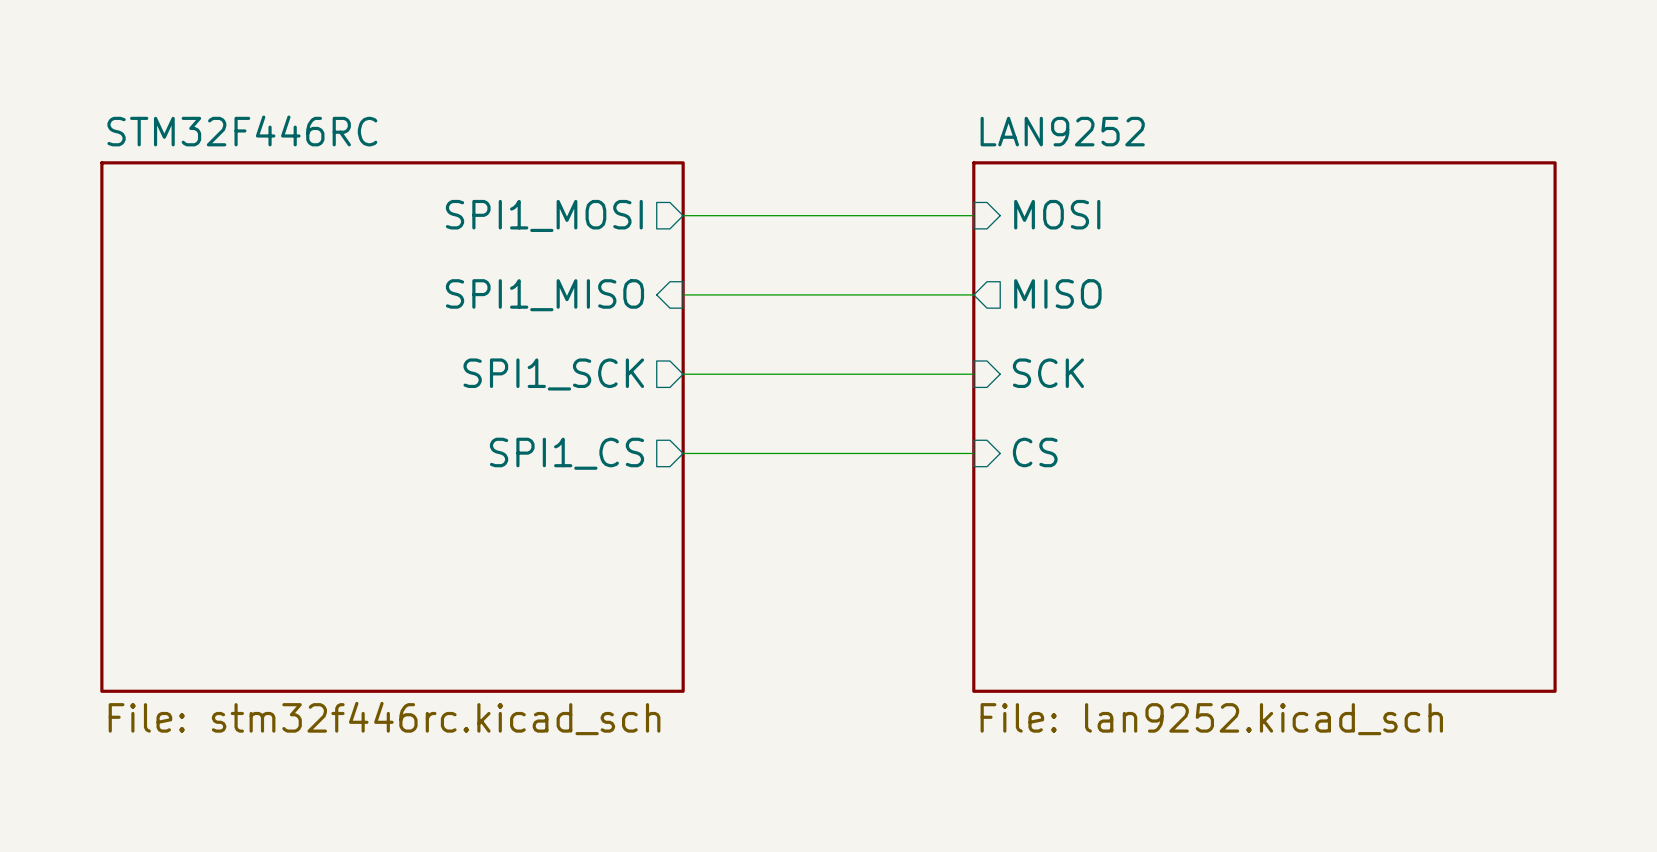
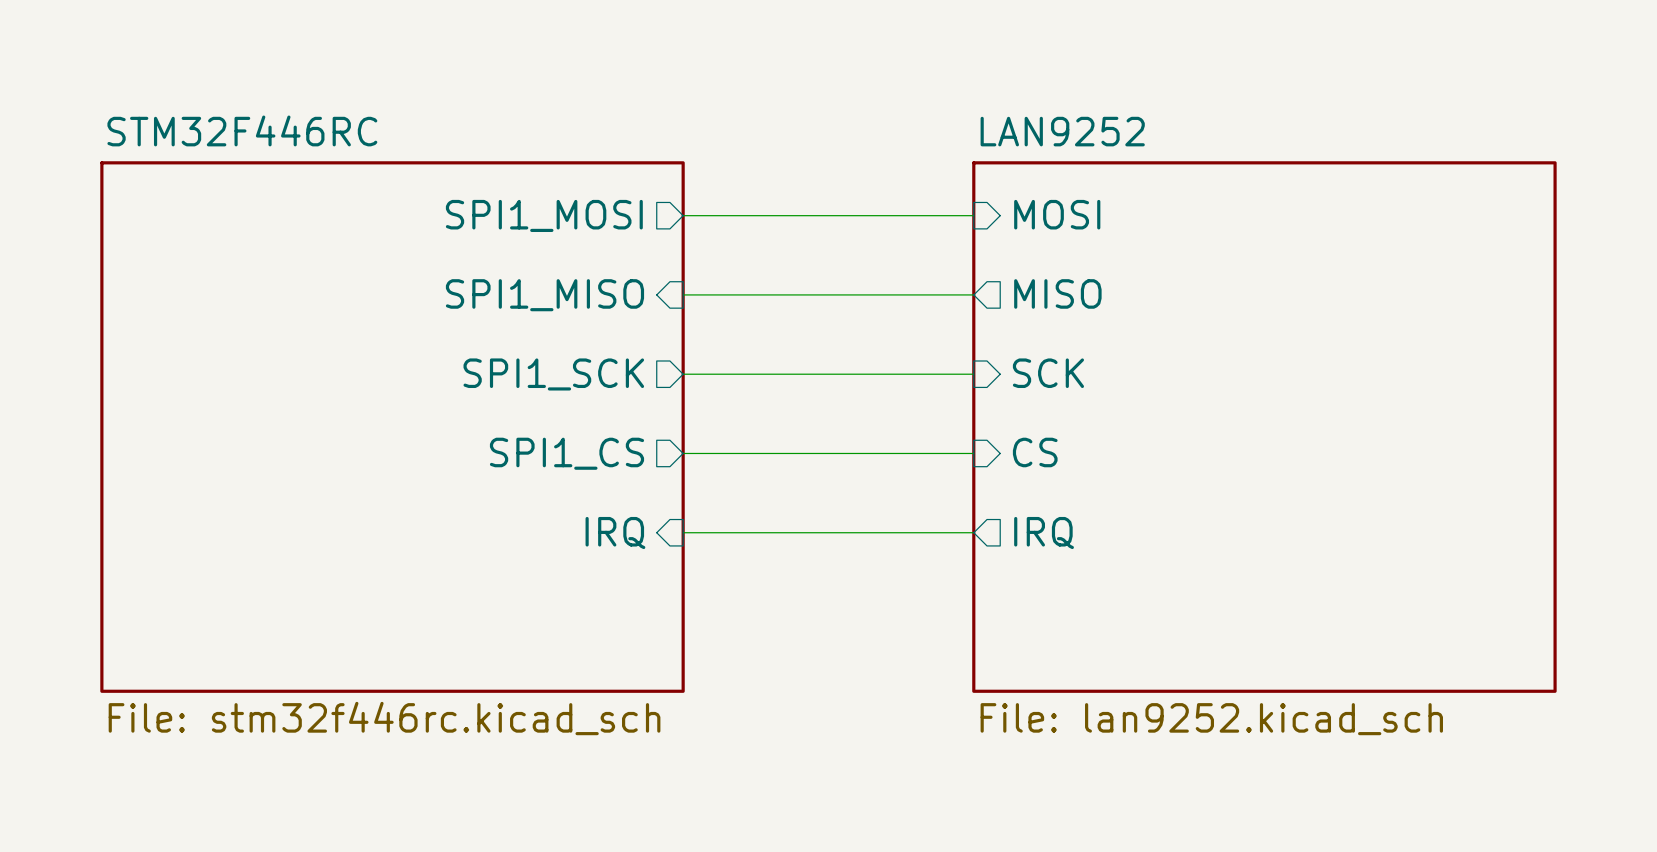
wire: none -> (683, 532) (973, 532)
sheet pin: none -> IRQ (615, 533)
sheet pin: none -> IRQ (1044, 533)

